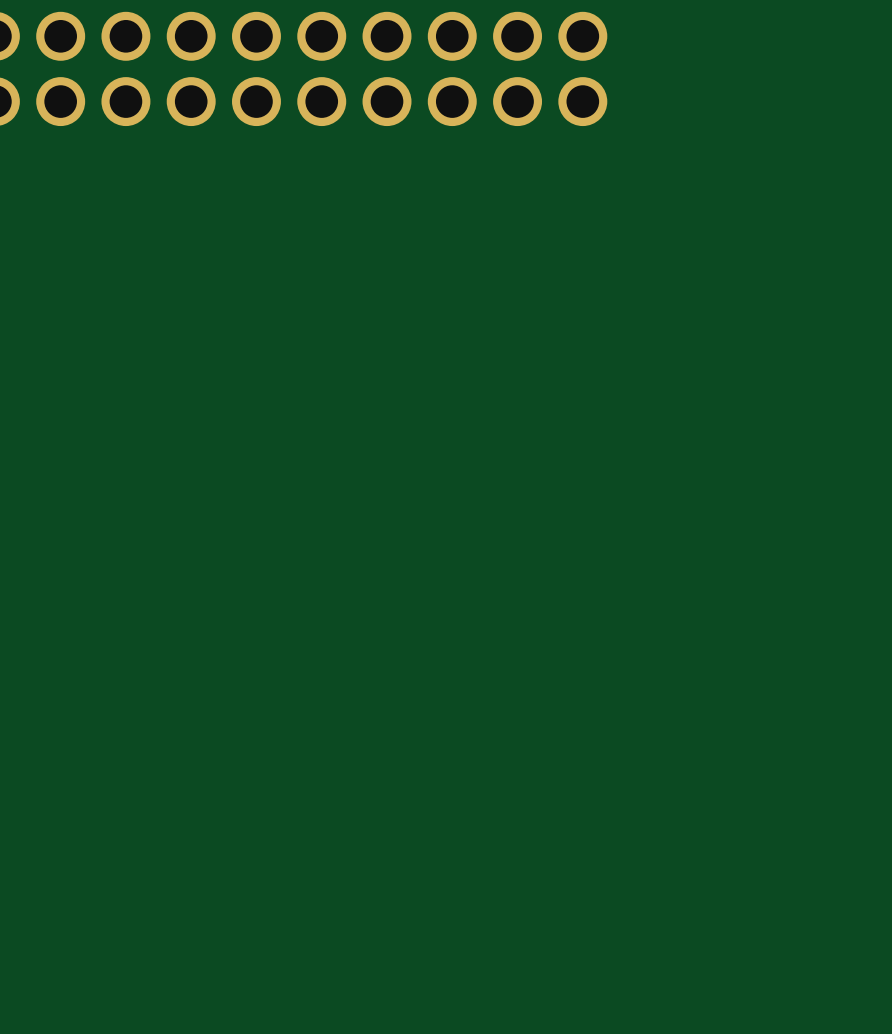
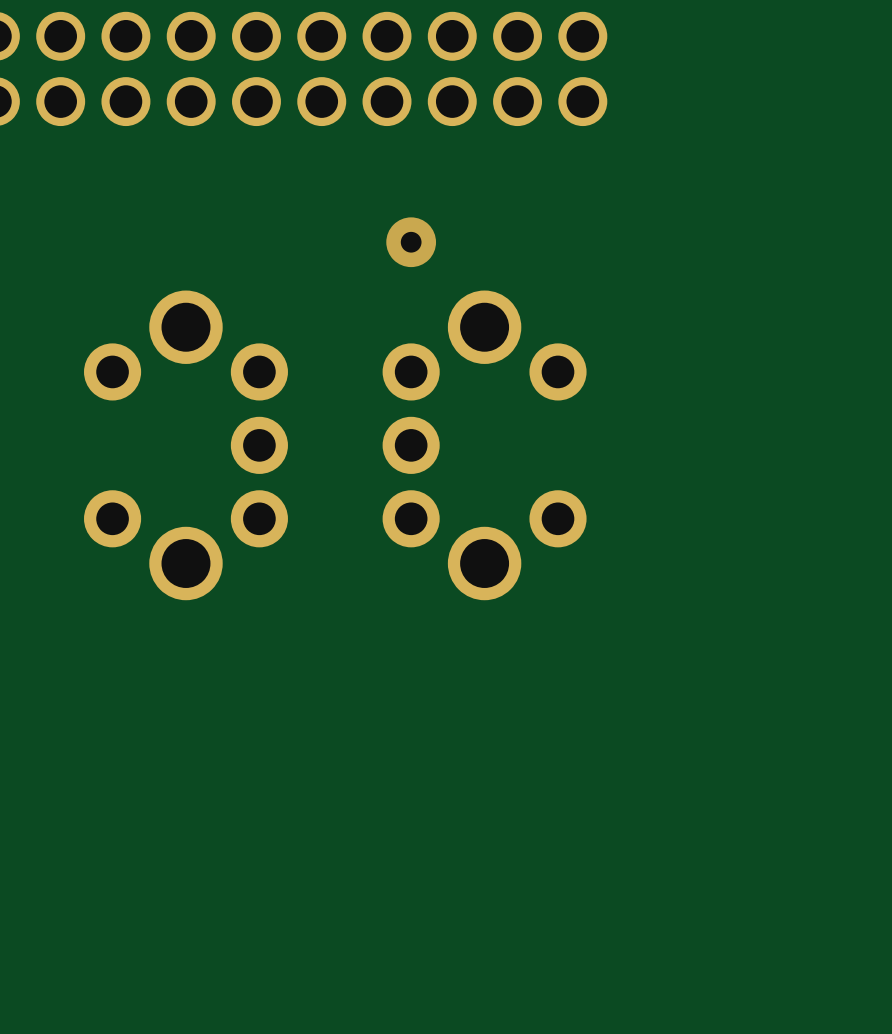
via: none -> (411, 242)
part: none -> (185, 445)
part: none -> (484, 445)

